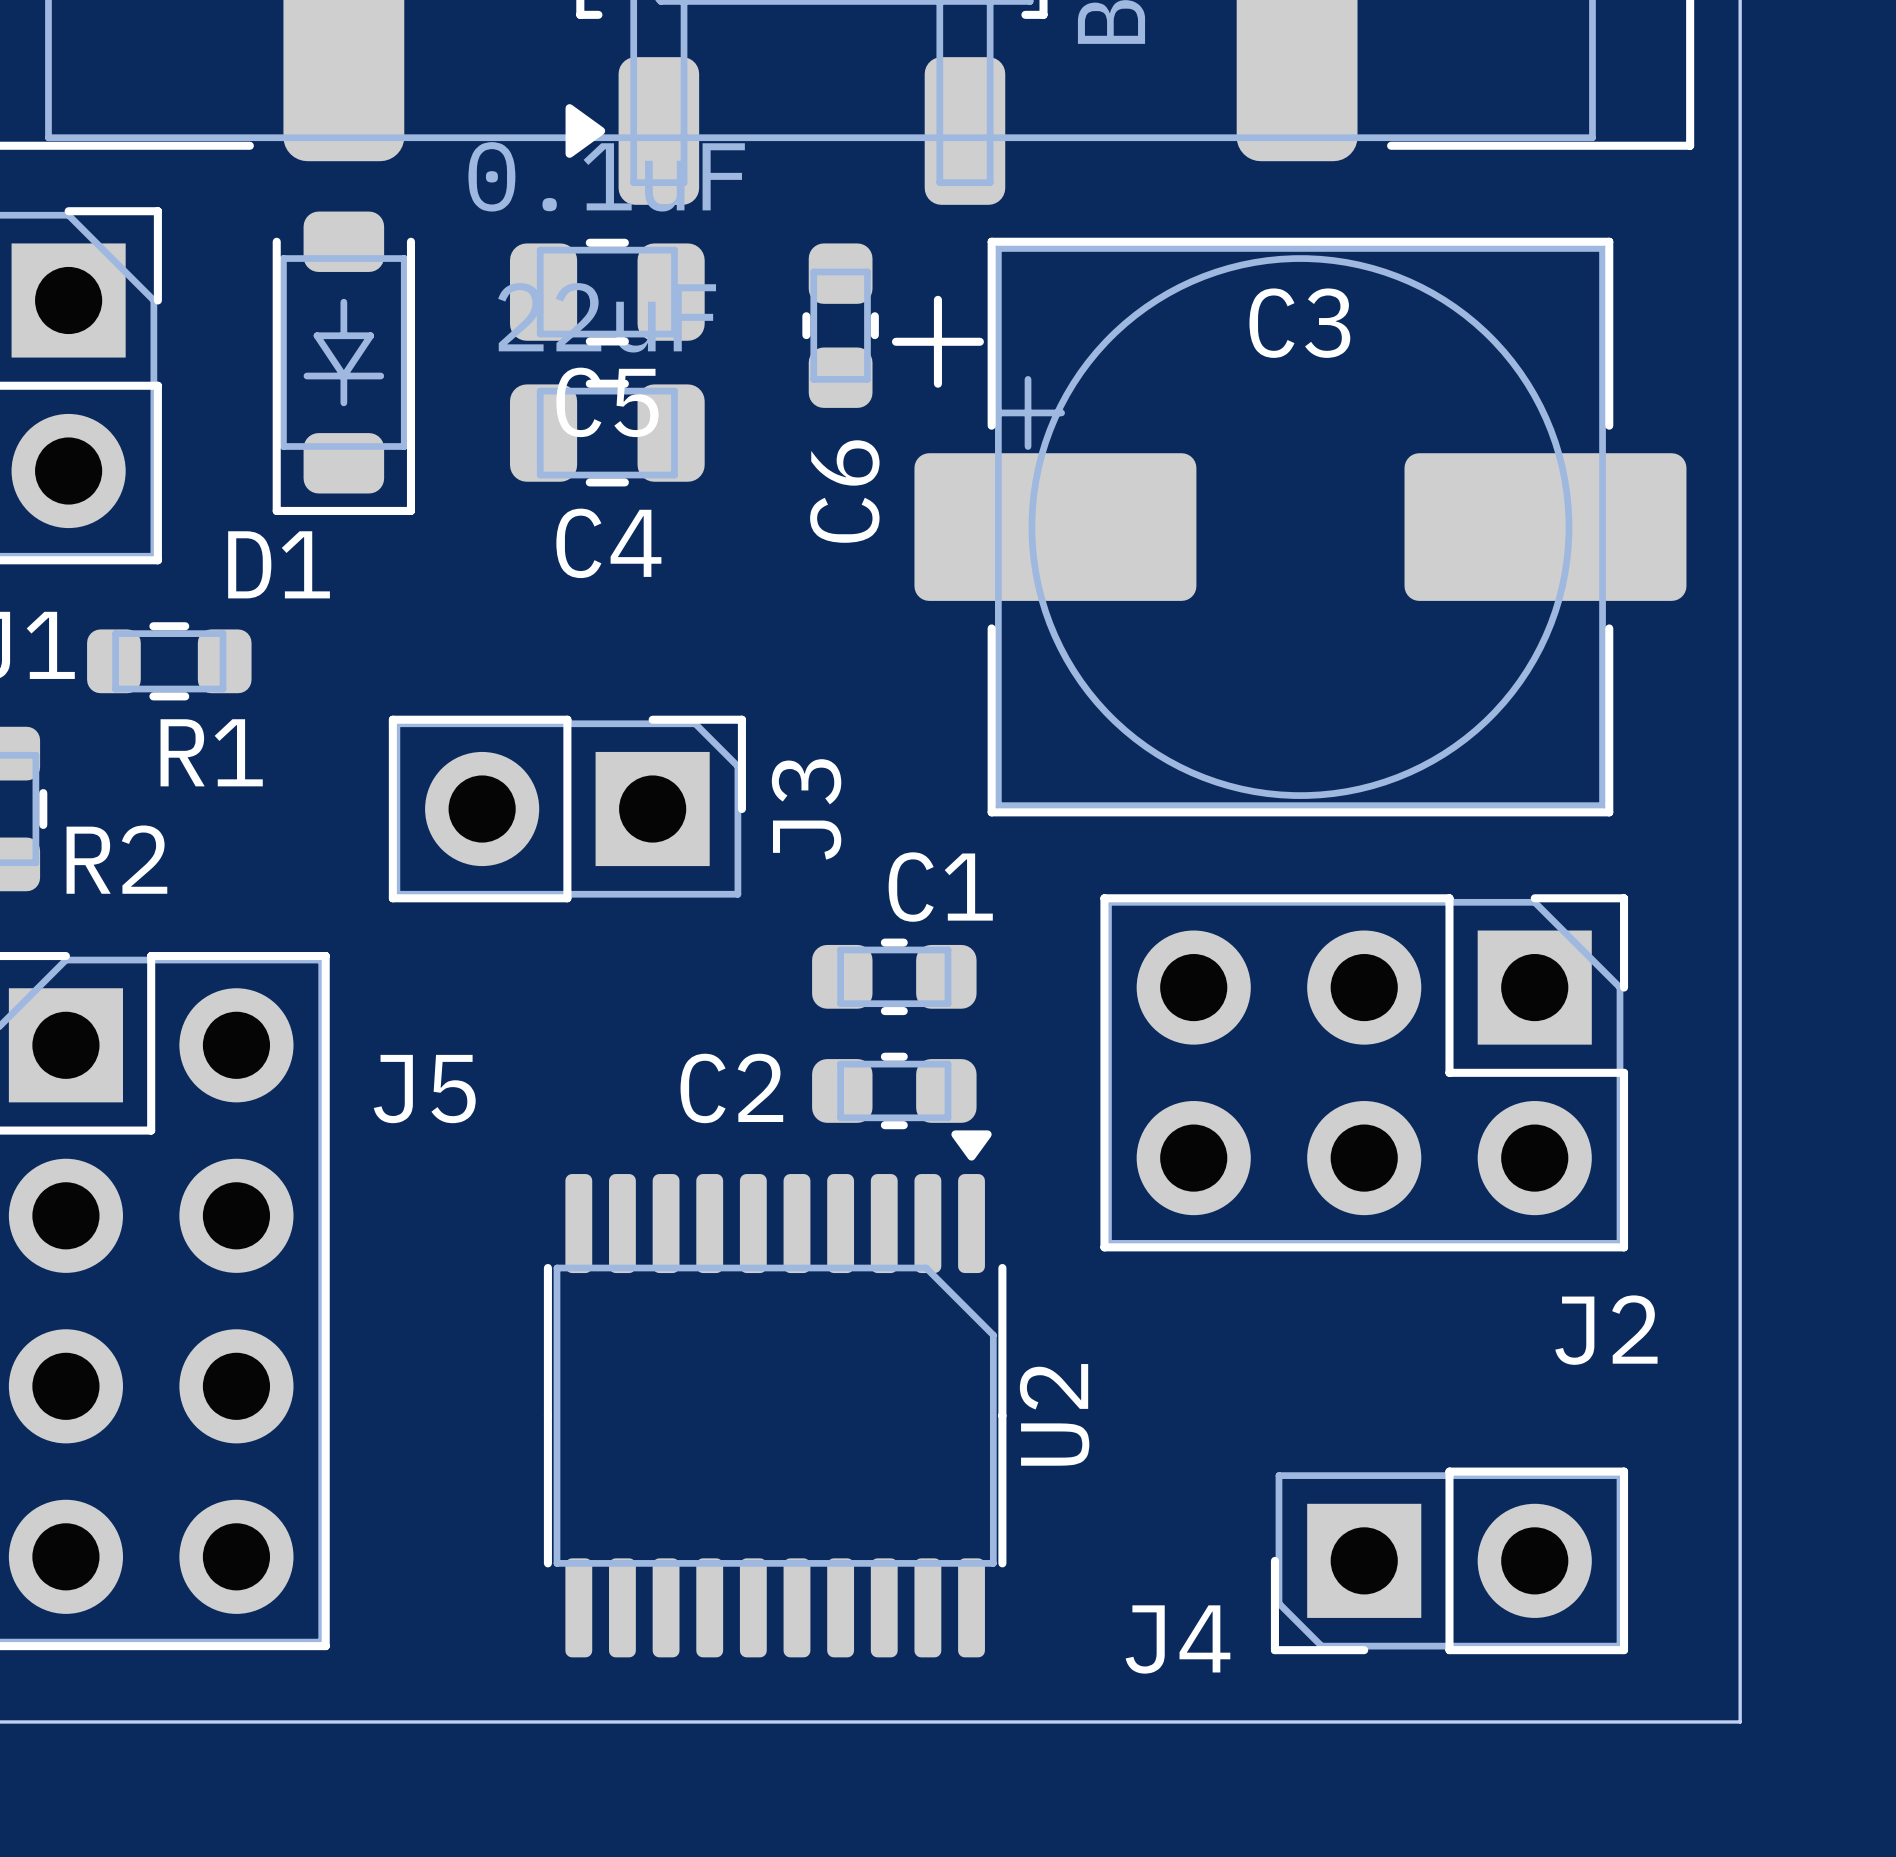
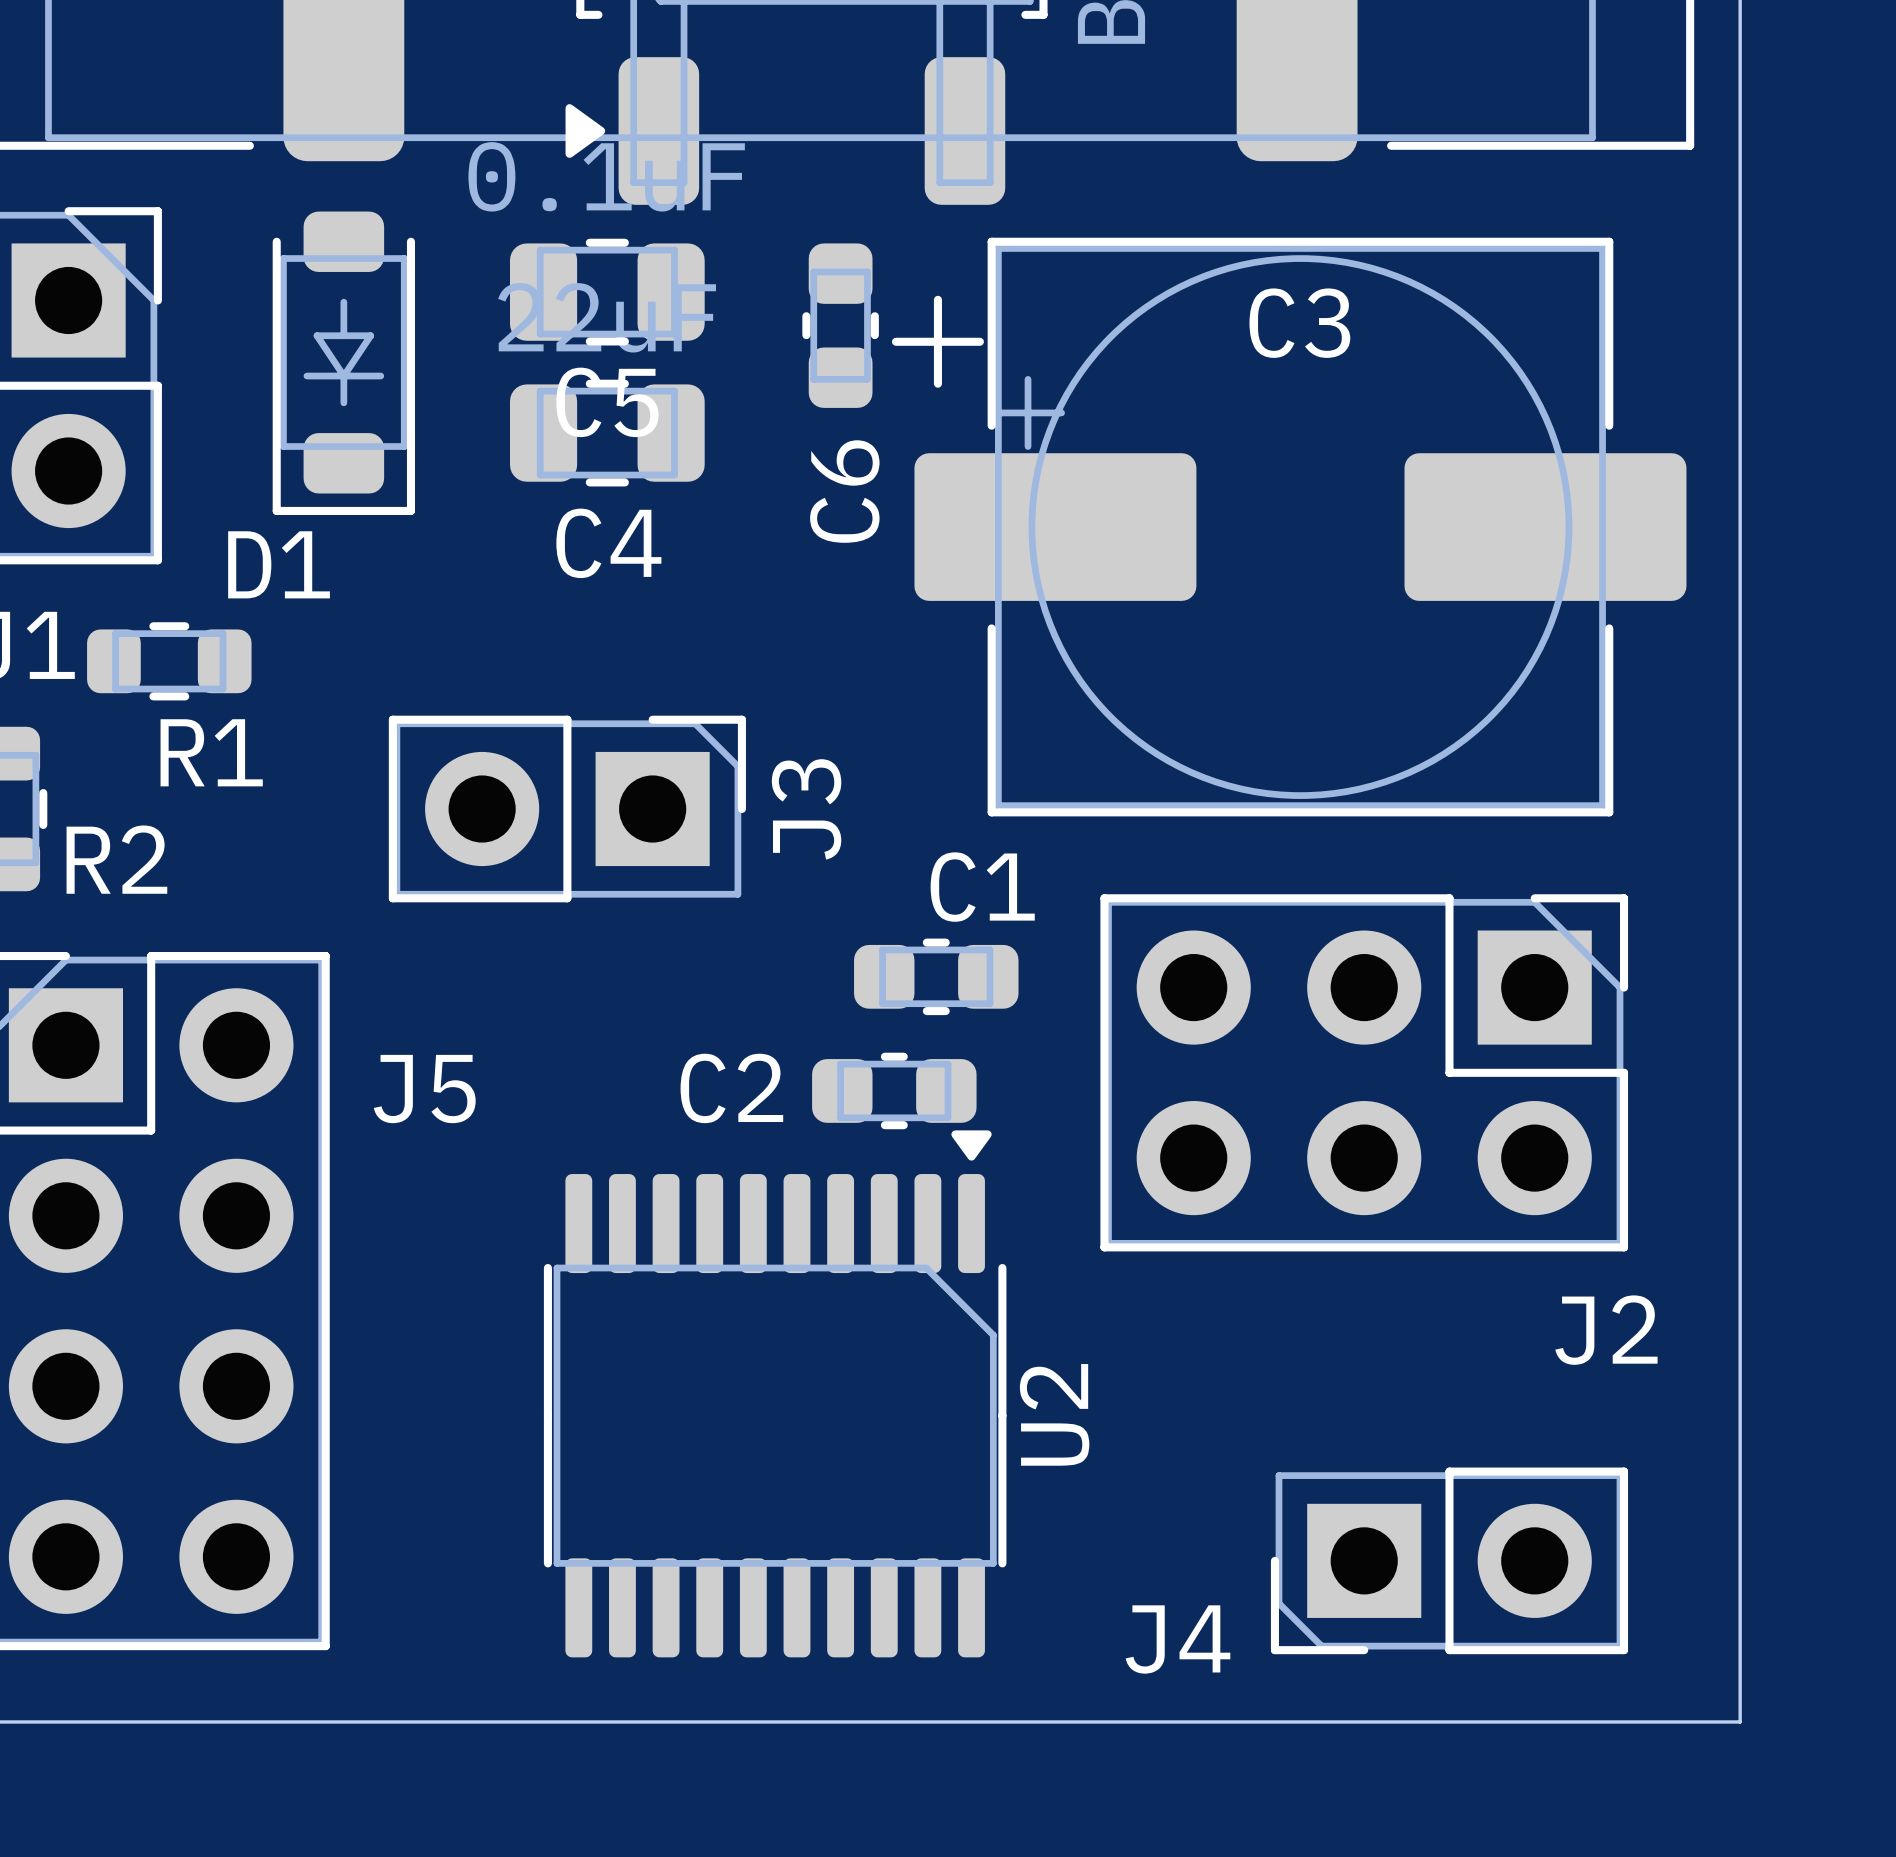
C1 position: (894, 976) -> (936, 976)

